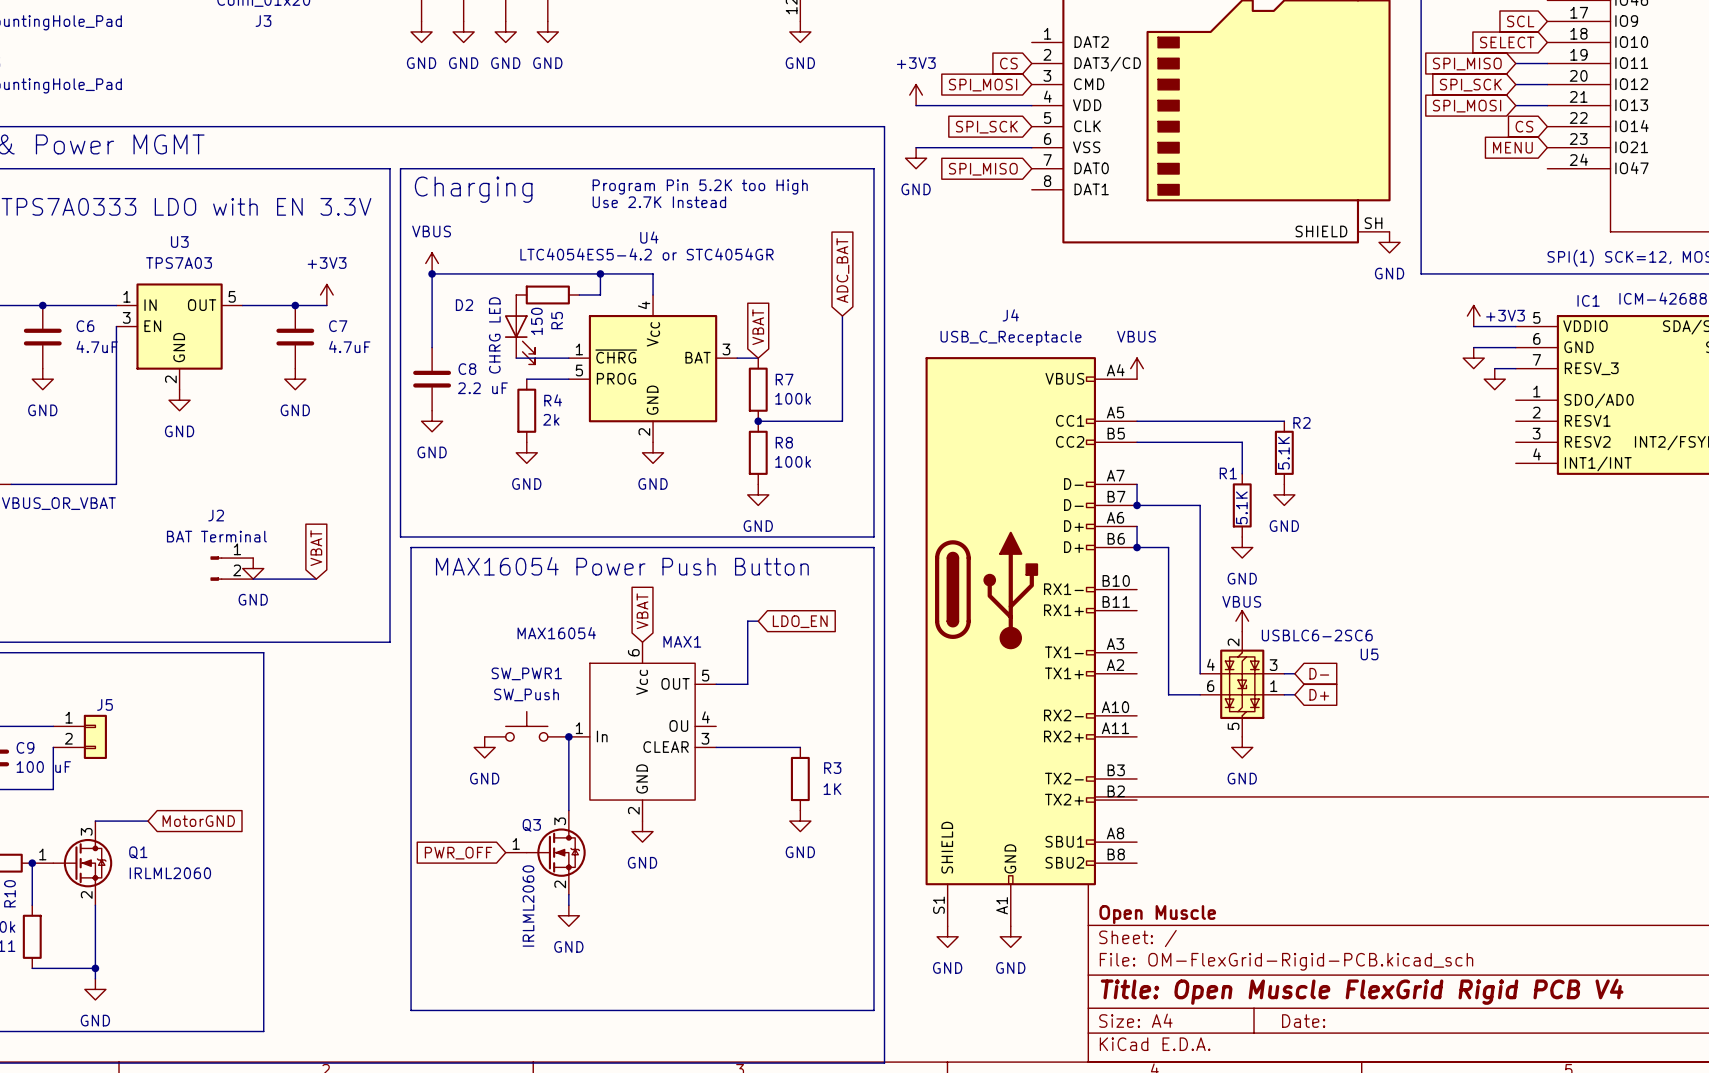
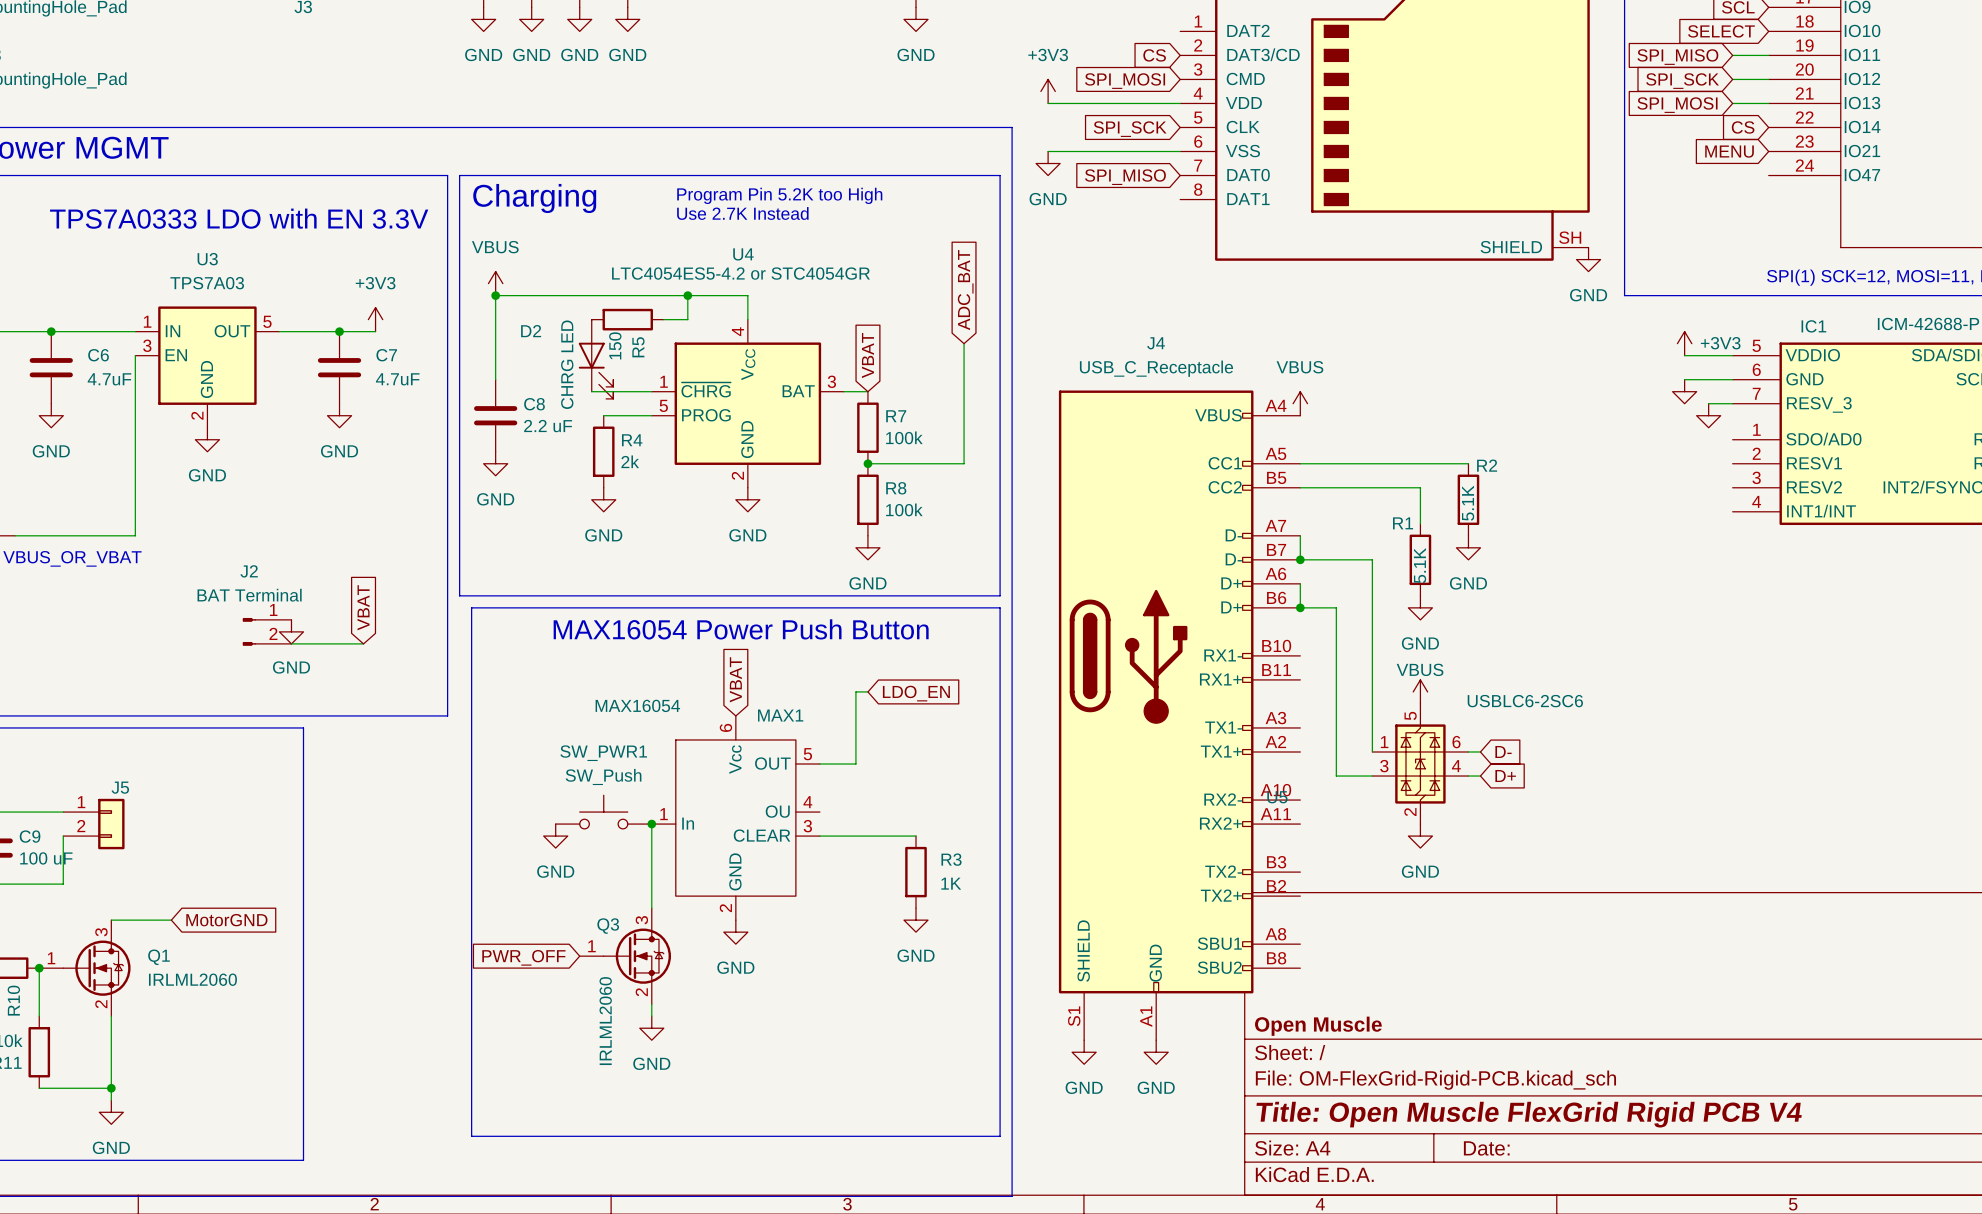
U5 rotation: 0° (1242, 684) -> 180° (1420, 764)

